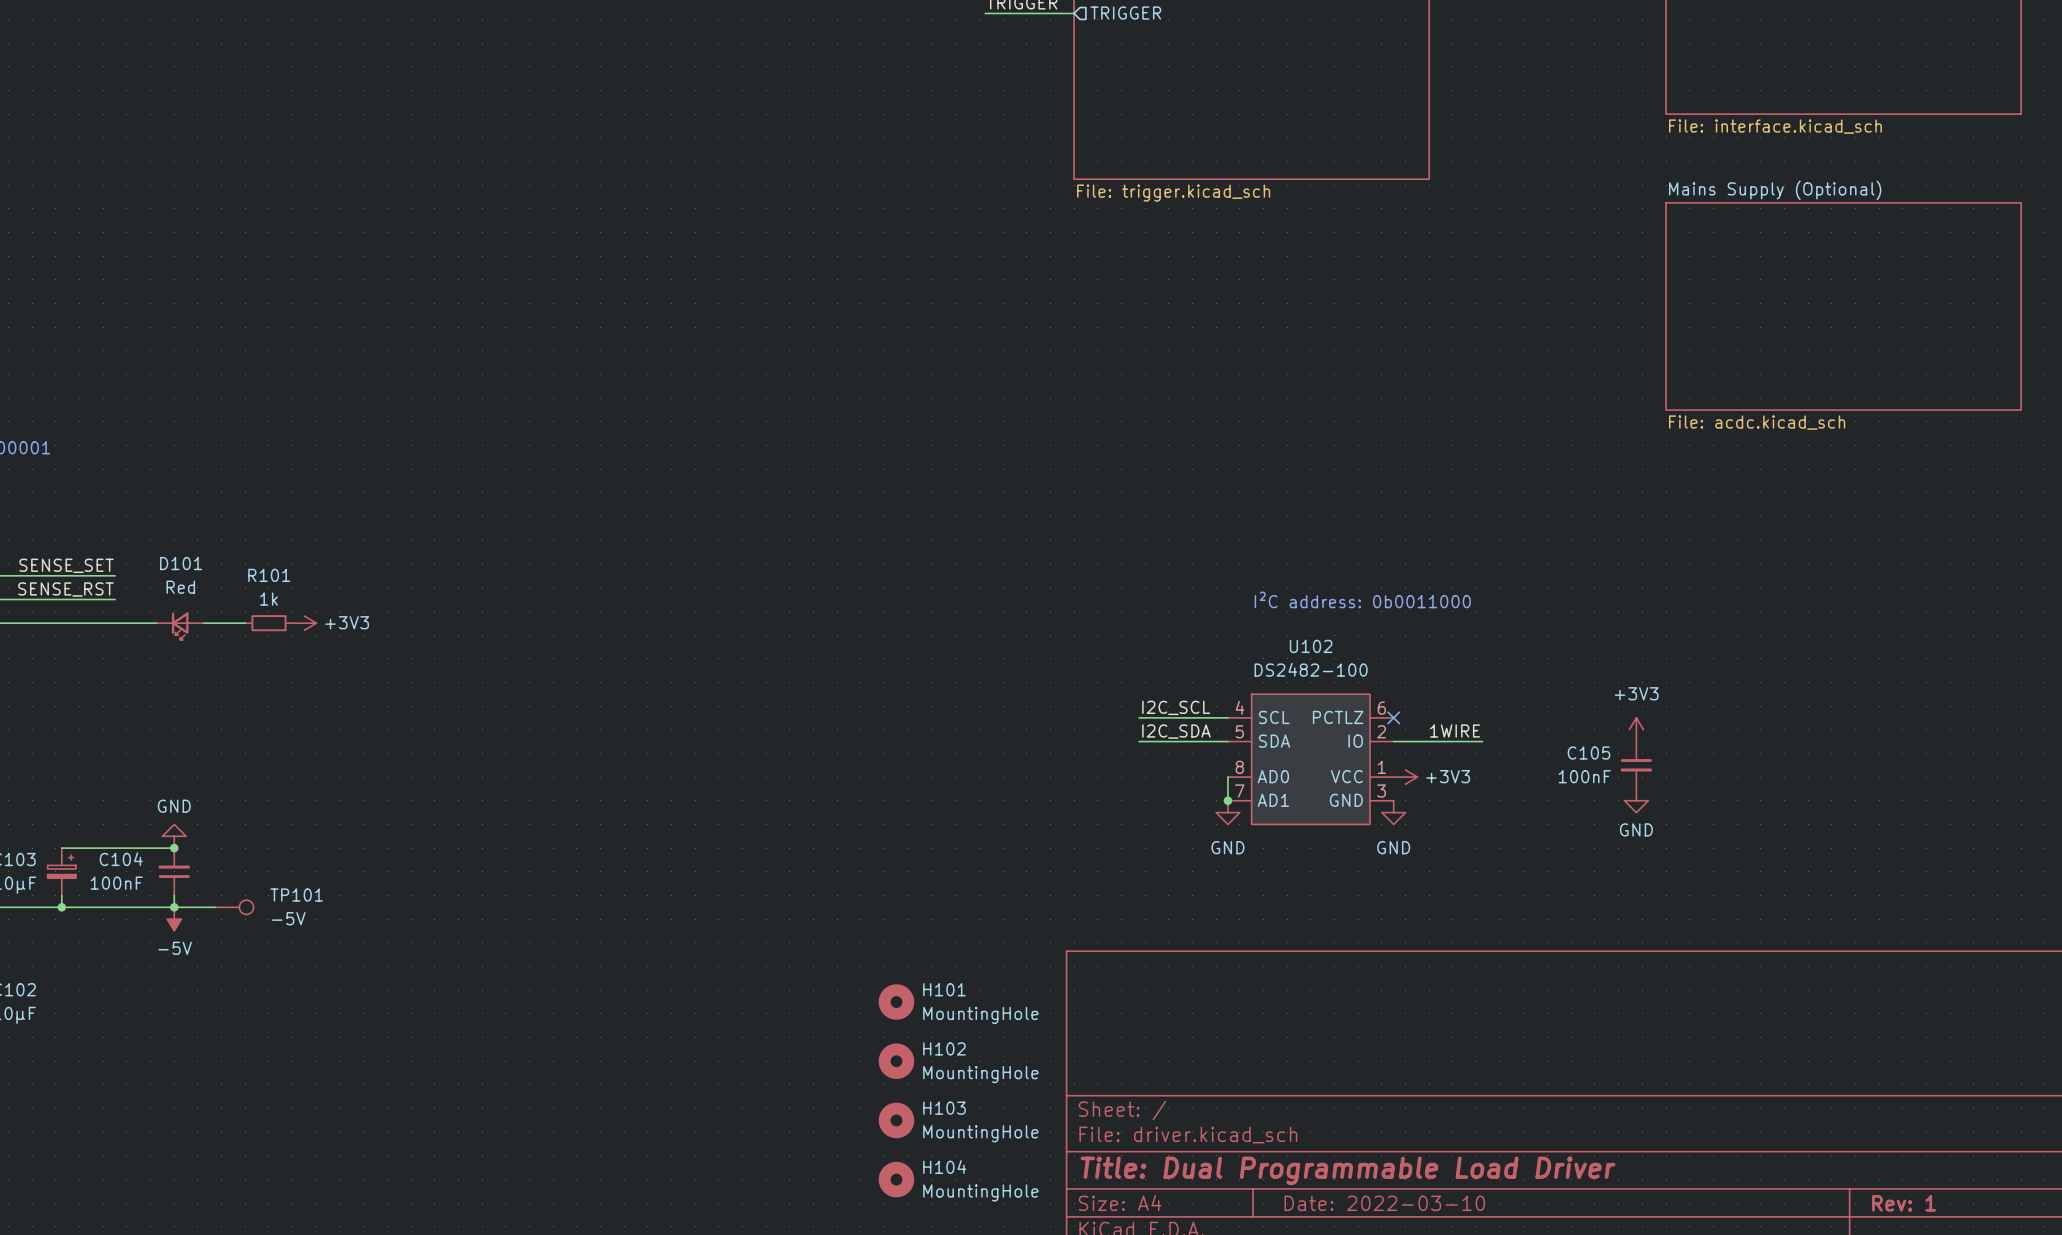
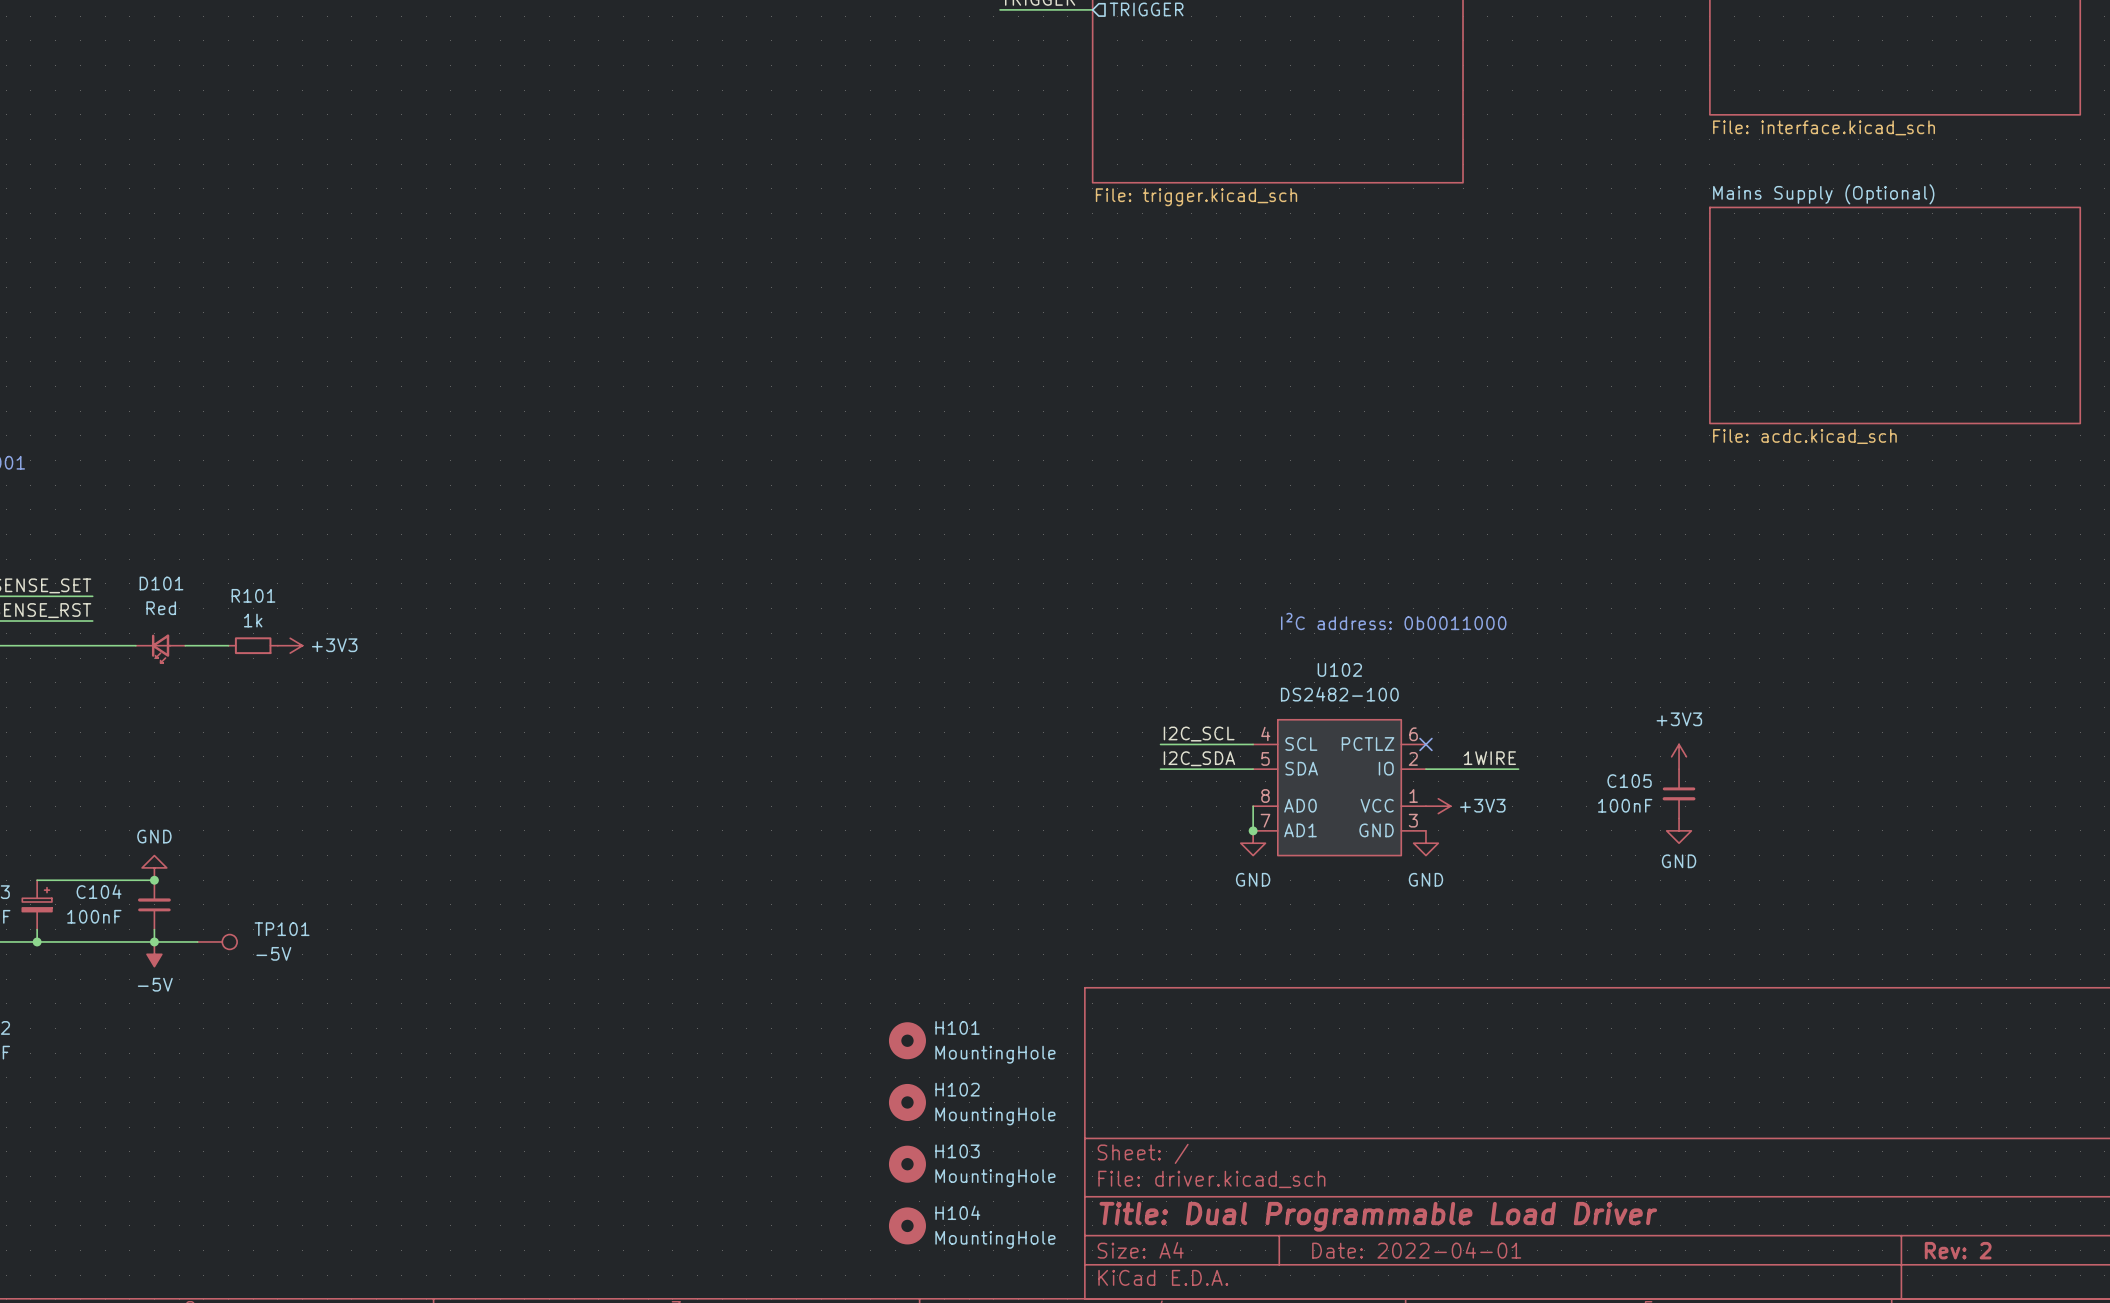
title block: Date: 2022-03-10 (1384, 1203) -> Date: 2022-04-01 (1416, 1250)
title block: Rev: 1 (1904, 1203) -> Rev: 2 (1958, 1250)

